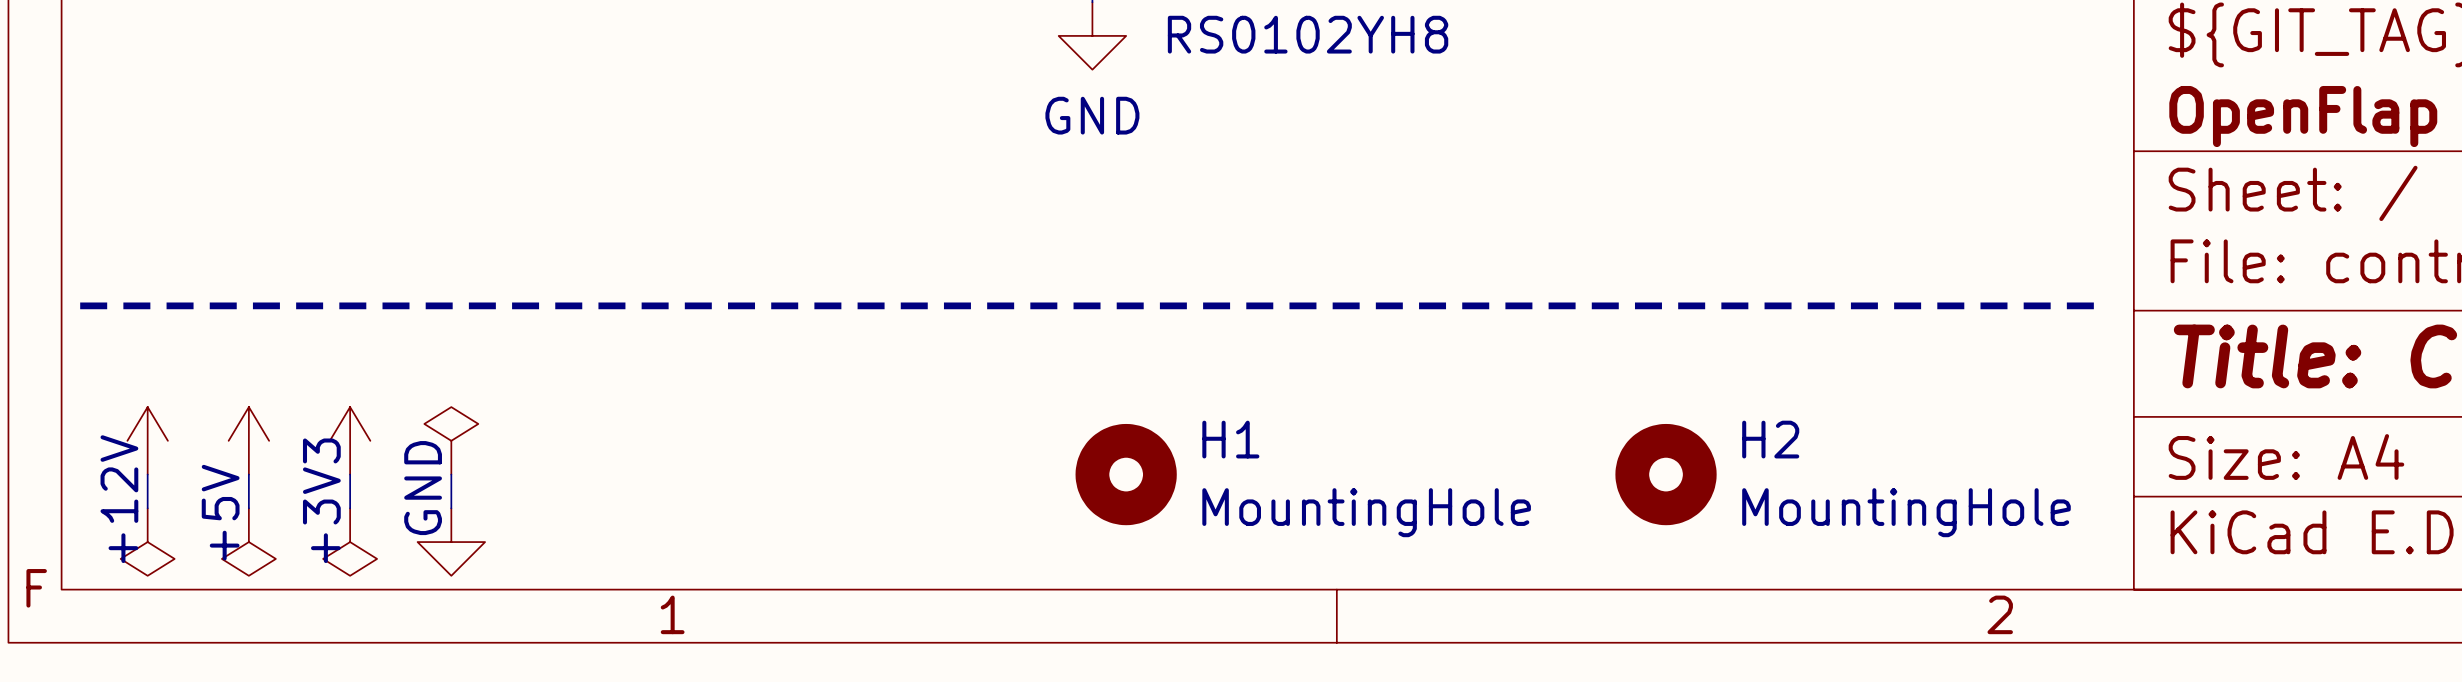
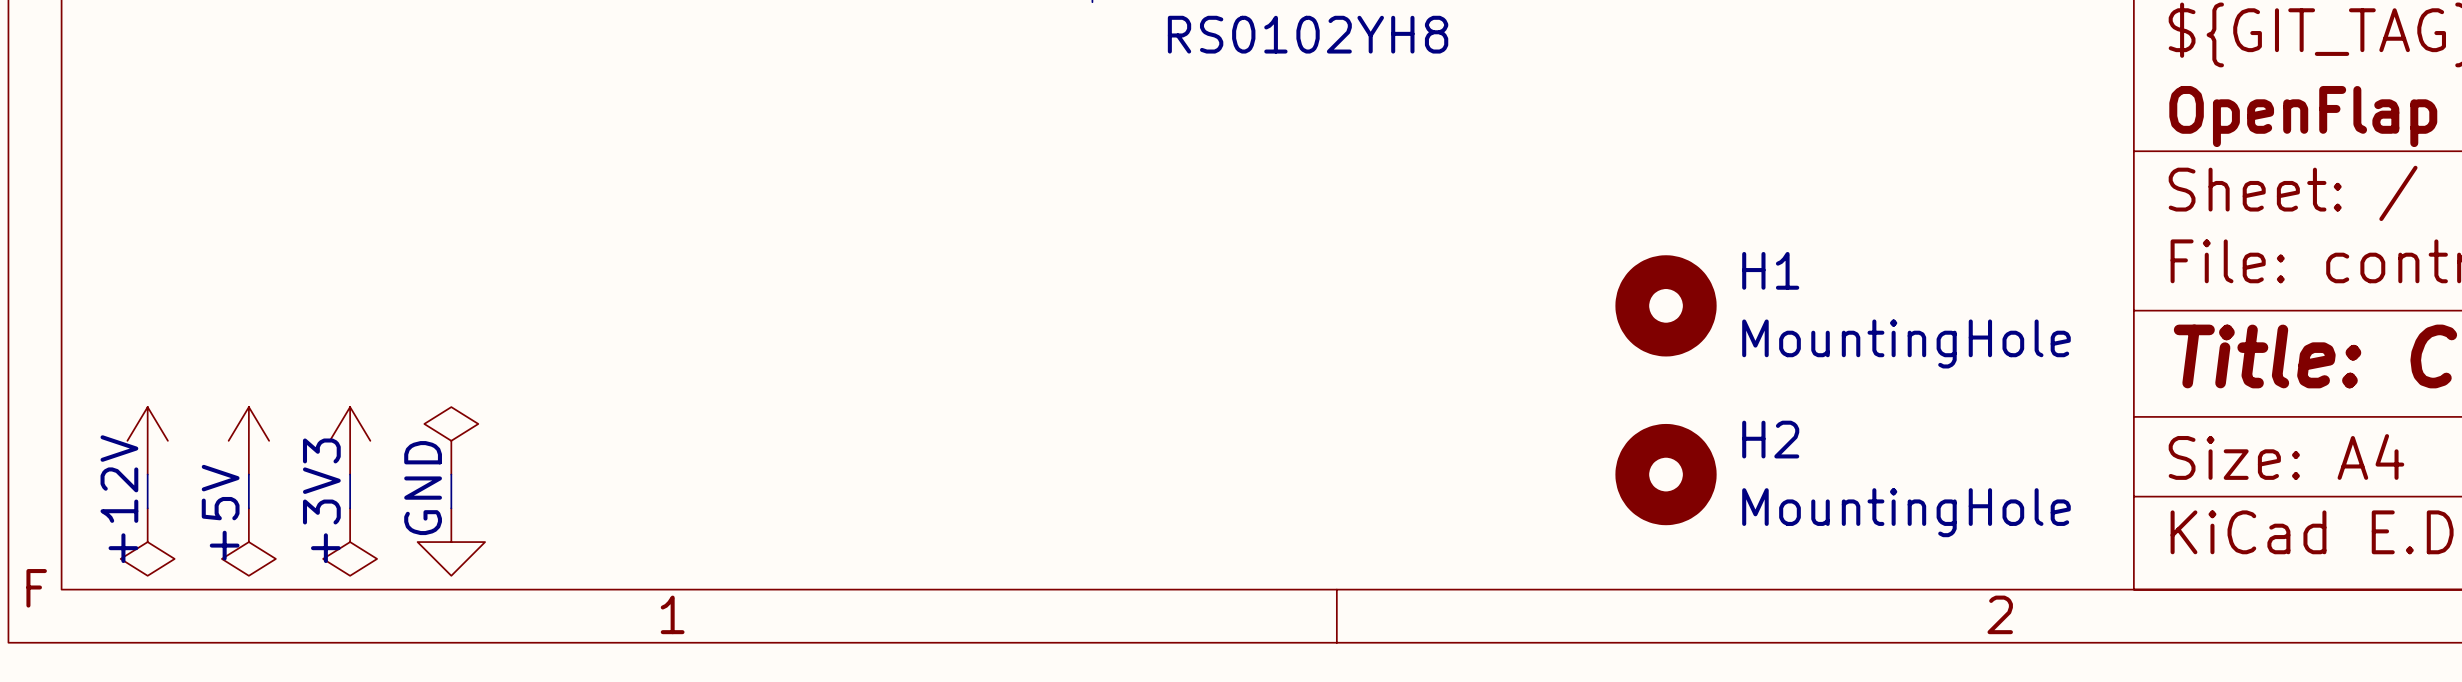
power symbol: GND (1092, 35) -> none
line: (80, 305) (2104, 305) -> none
H1 position: (1126, 474) -> (1666, 305)

